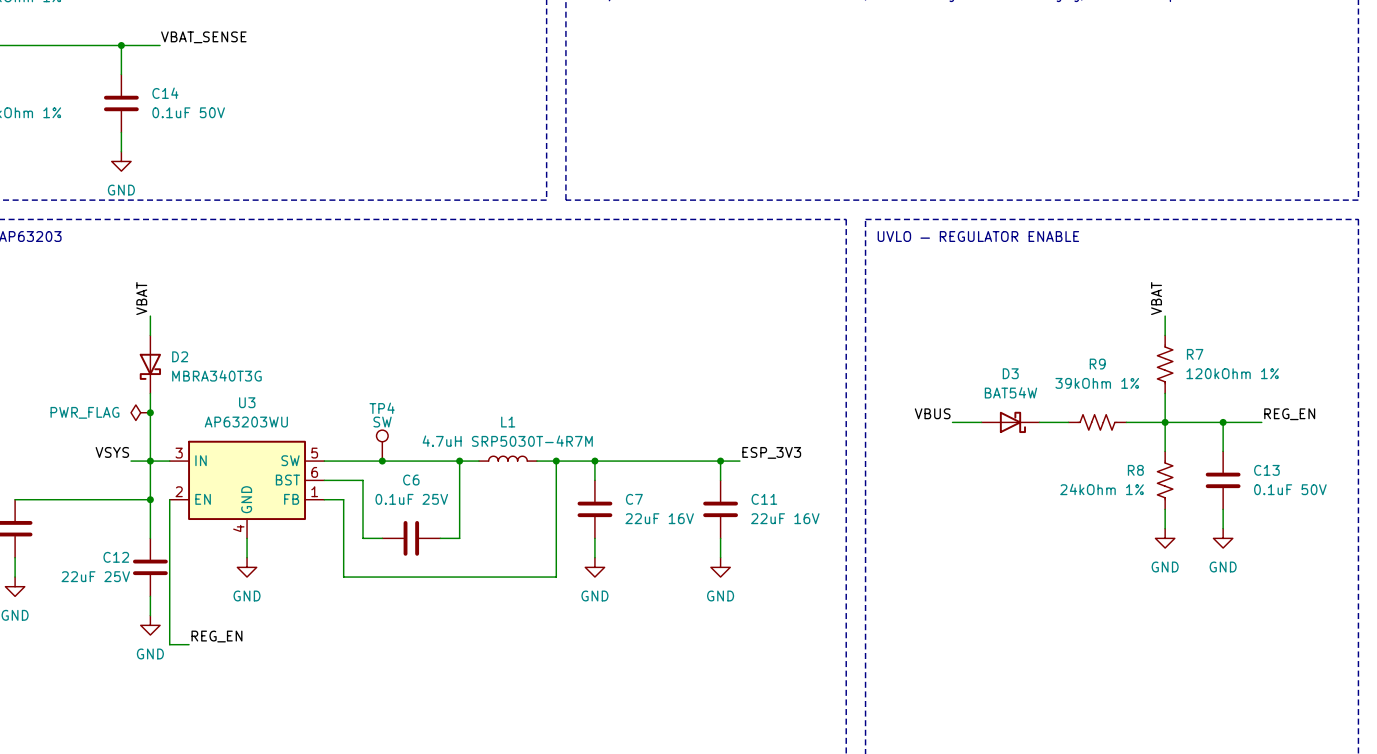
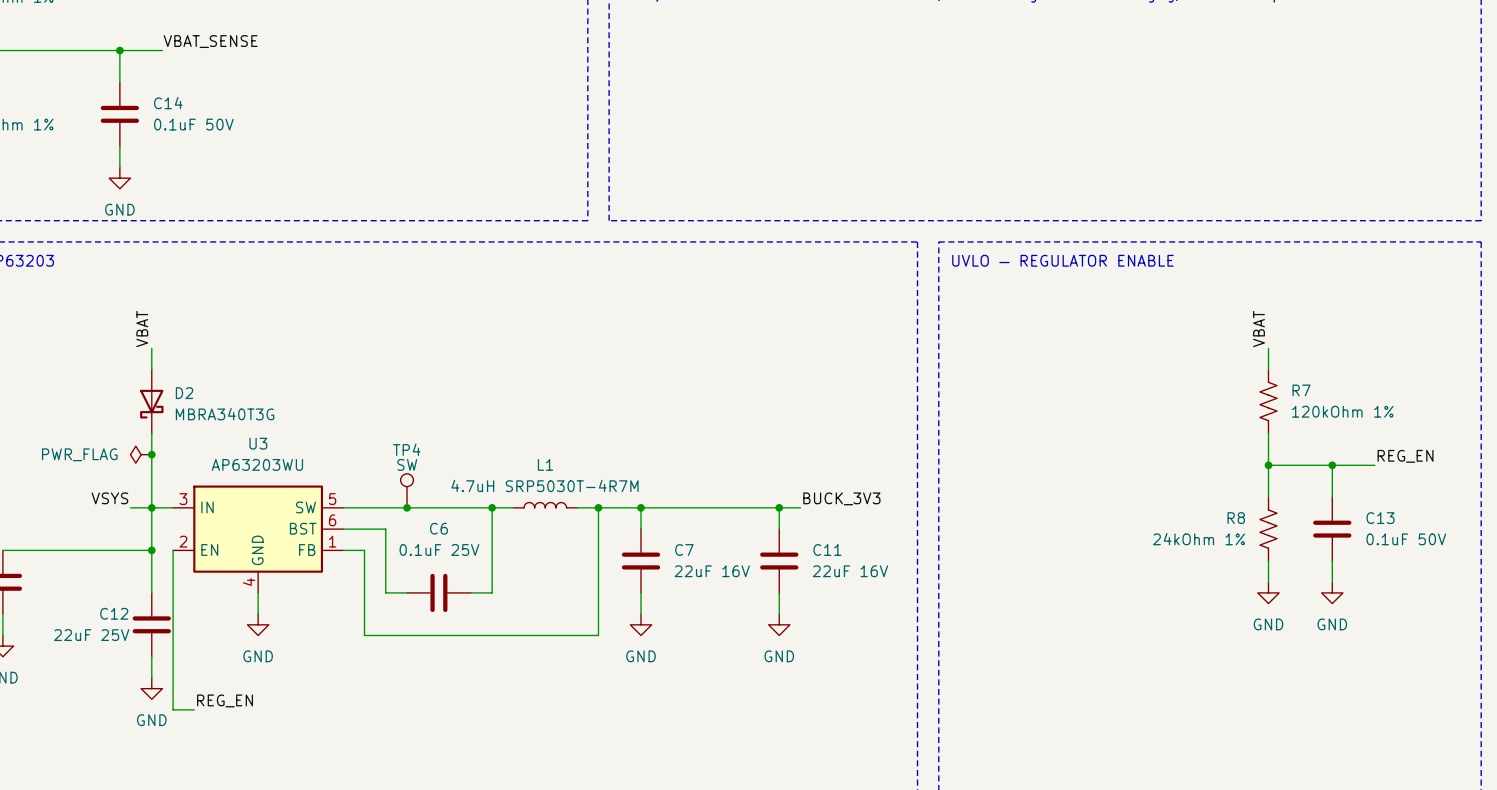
label: VBUS (932, 413) -> none
wire: (952, 422) (981, 422) -> none
D3: BAT54W (1010, 422) -> none
wire: (1039, 422) (1068, 422) -> none
R9: 39kOhm 1% (1097, 422) -> none
wire: (1126, 422) (1165, 422) -> none
label: ESP_3V3 (771, 452) -> BUCK_3V3 (841, 498)

